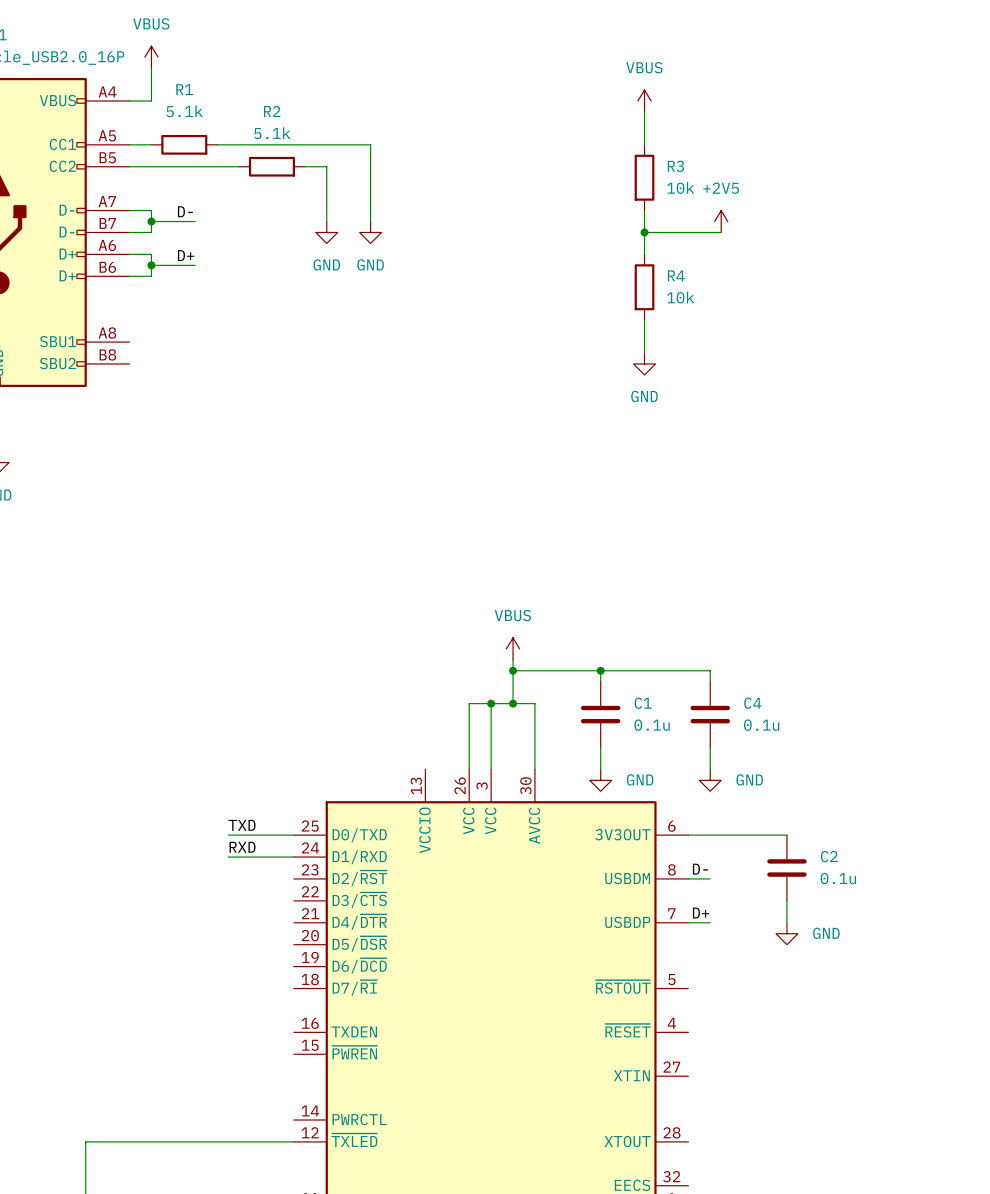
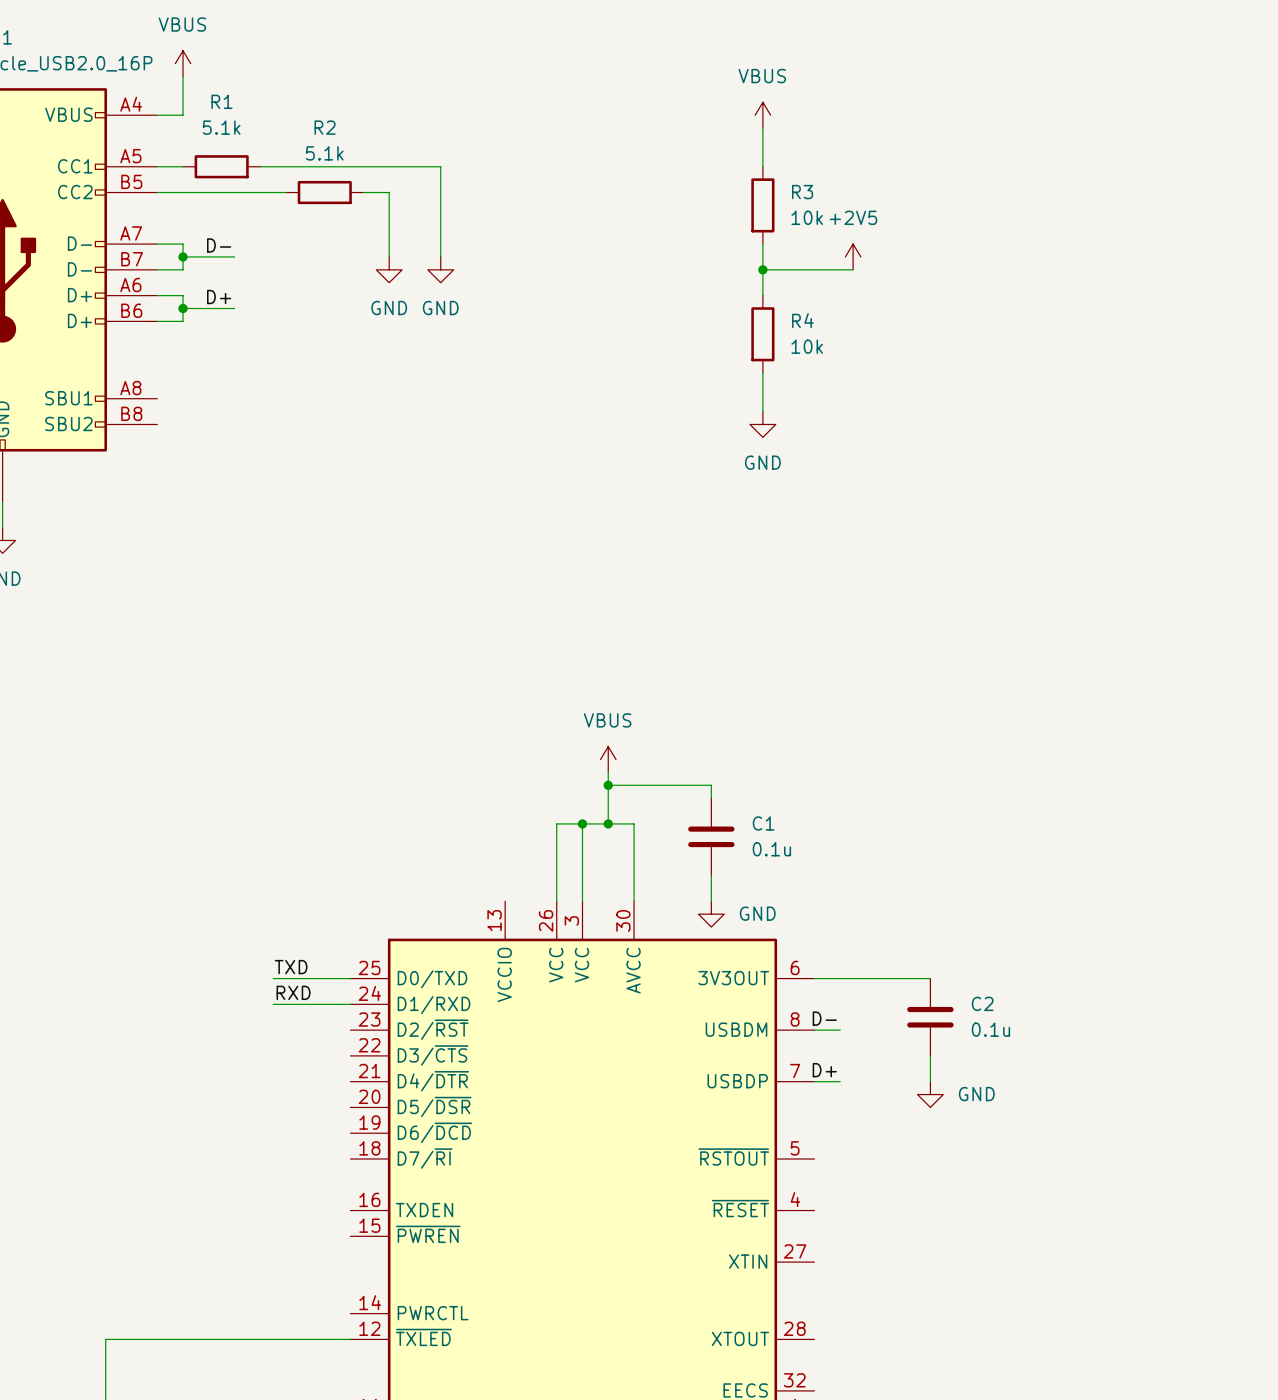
wire: (600, 670) (710, 670) (710, 681) -> none
junction: (600, 670) -> none
C4: 0.1u (710, 714) -> none
wire: (710, 747) (710, 769) -> none
power symbol: GND (710, 780) -> none

